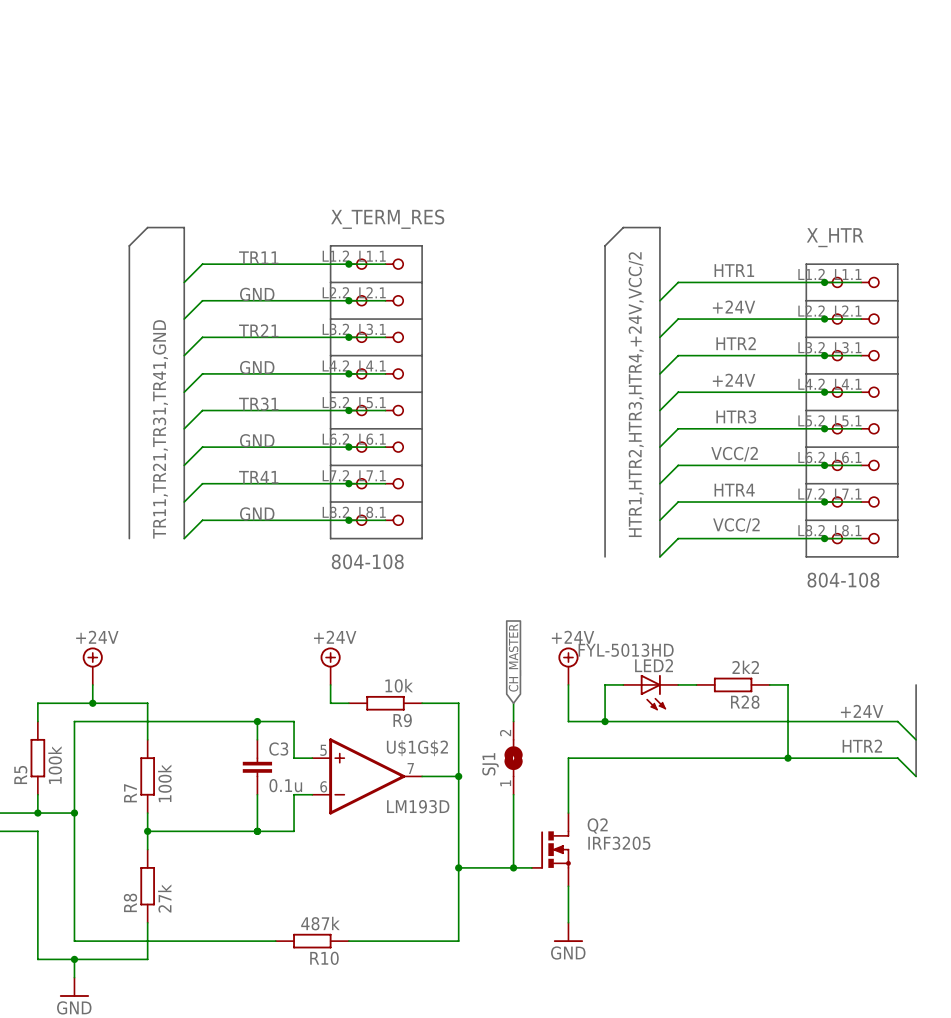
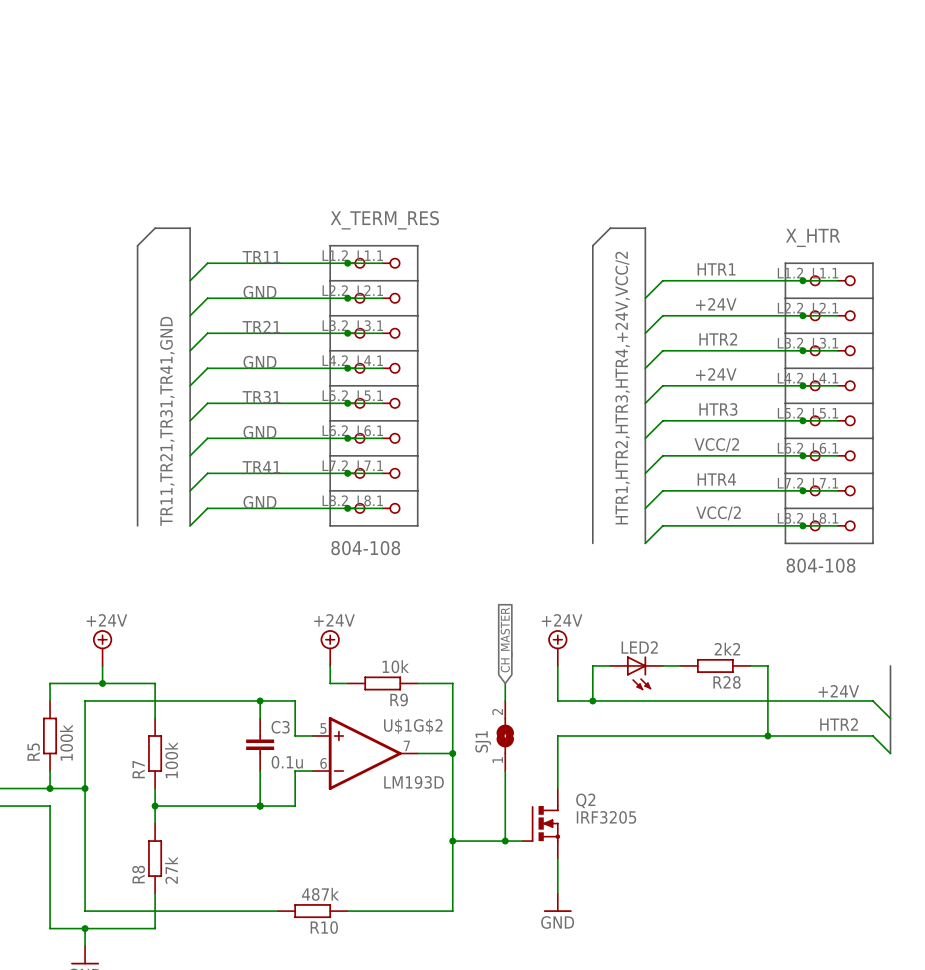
LED2 value: FYL-5013HD (626, 650) -> none

